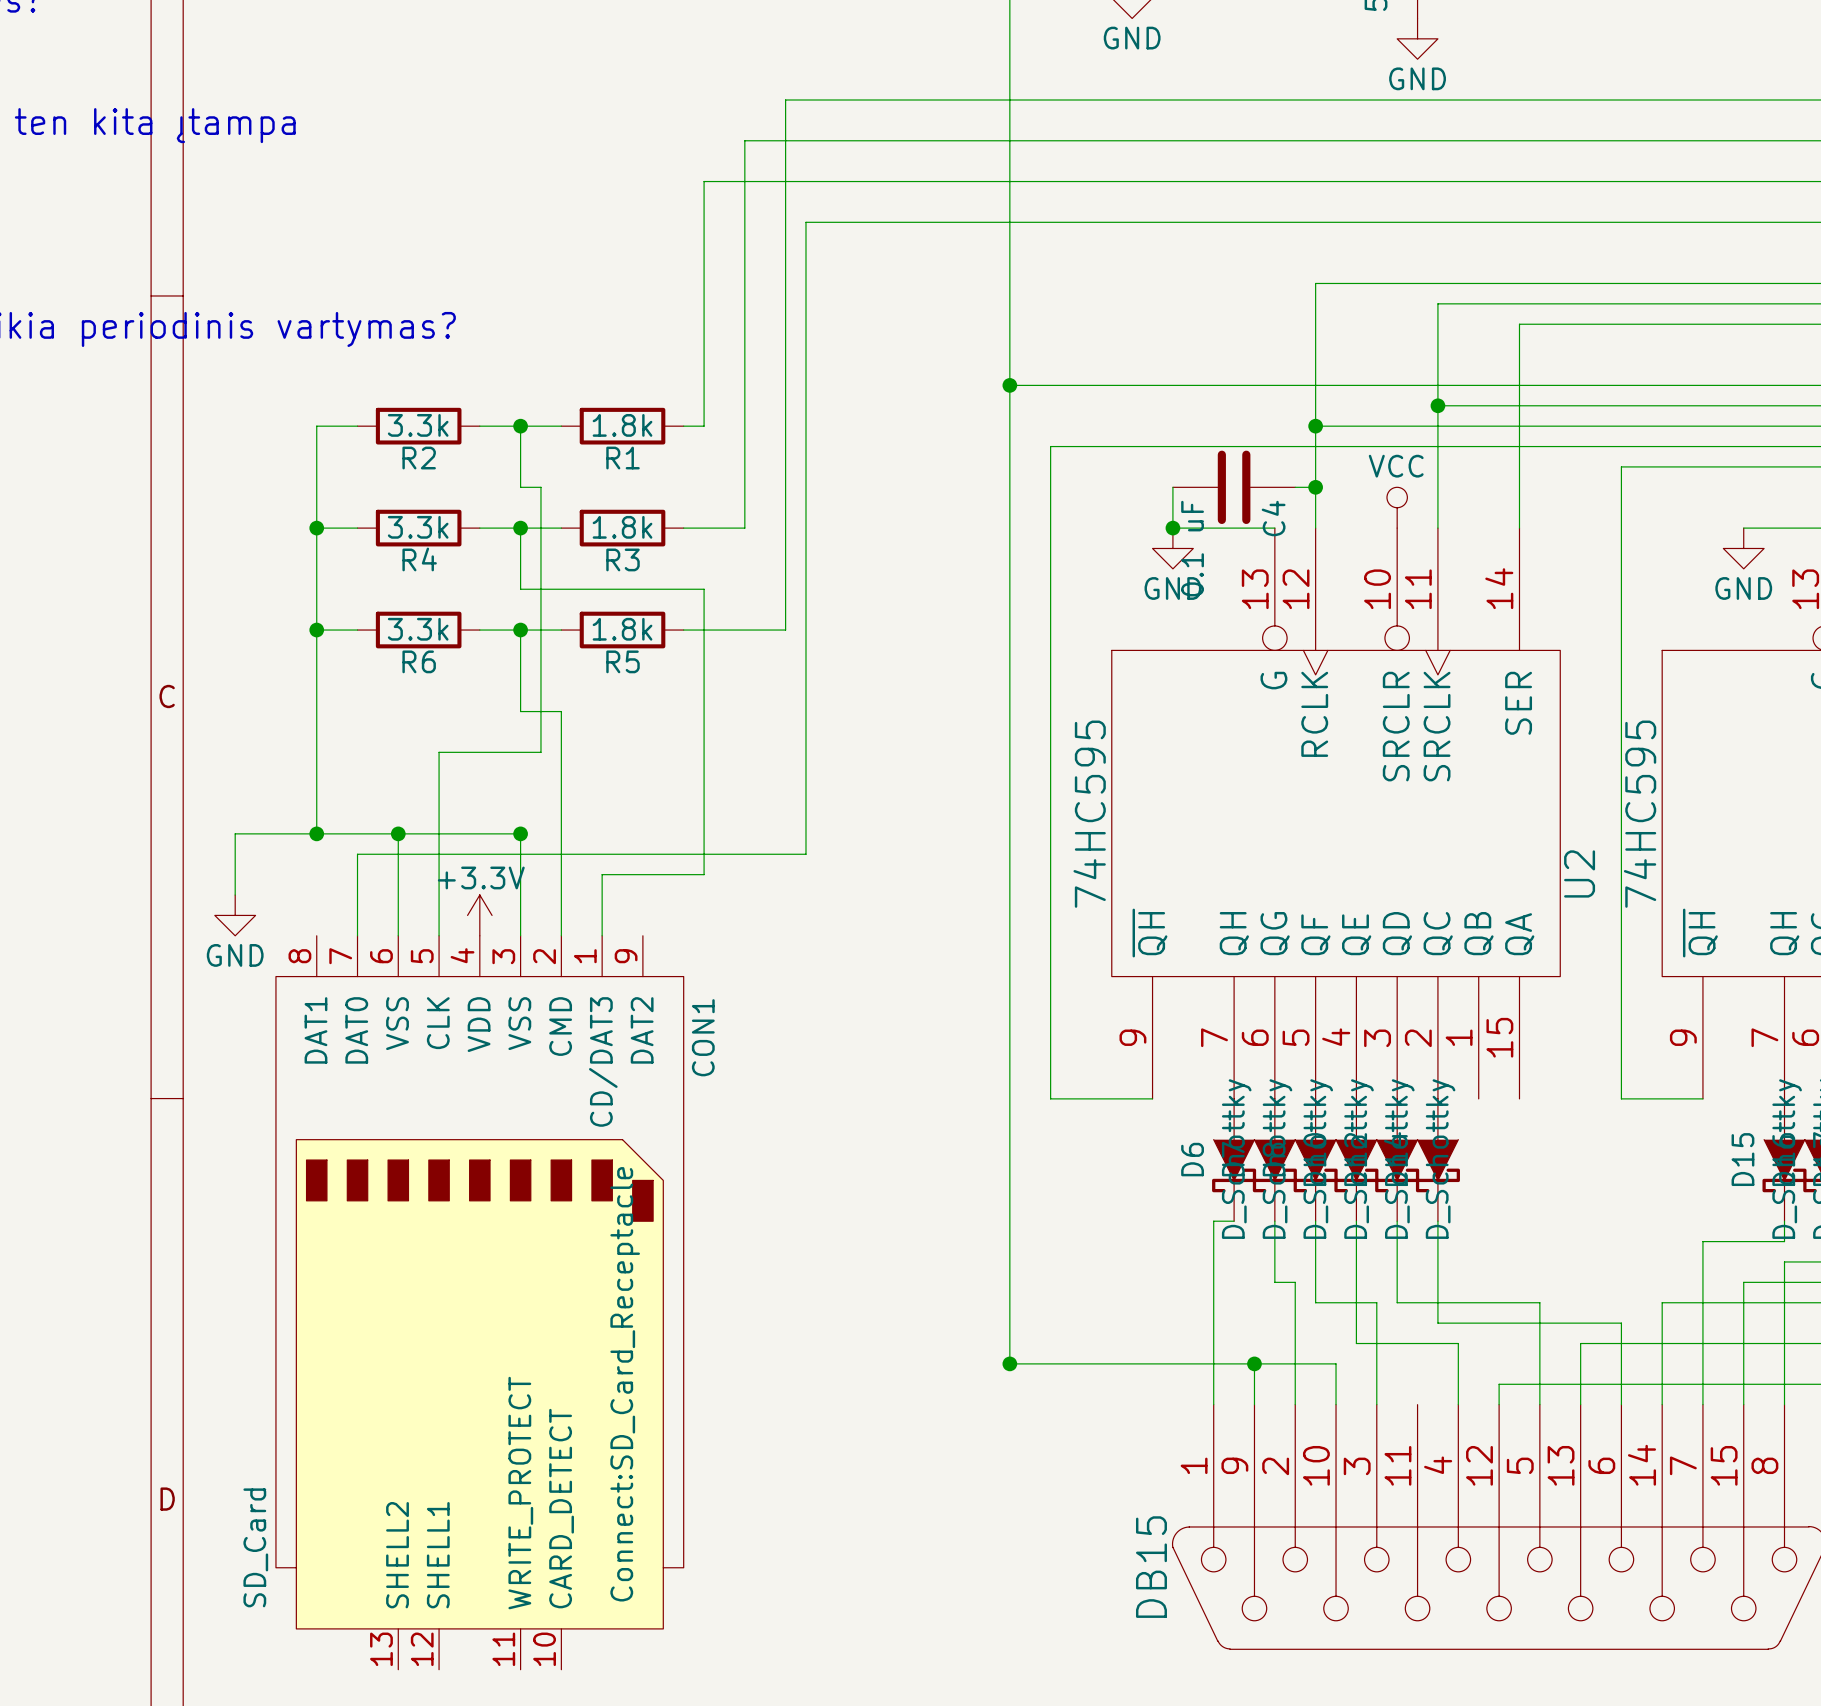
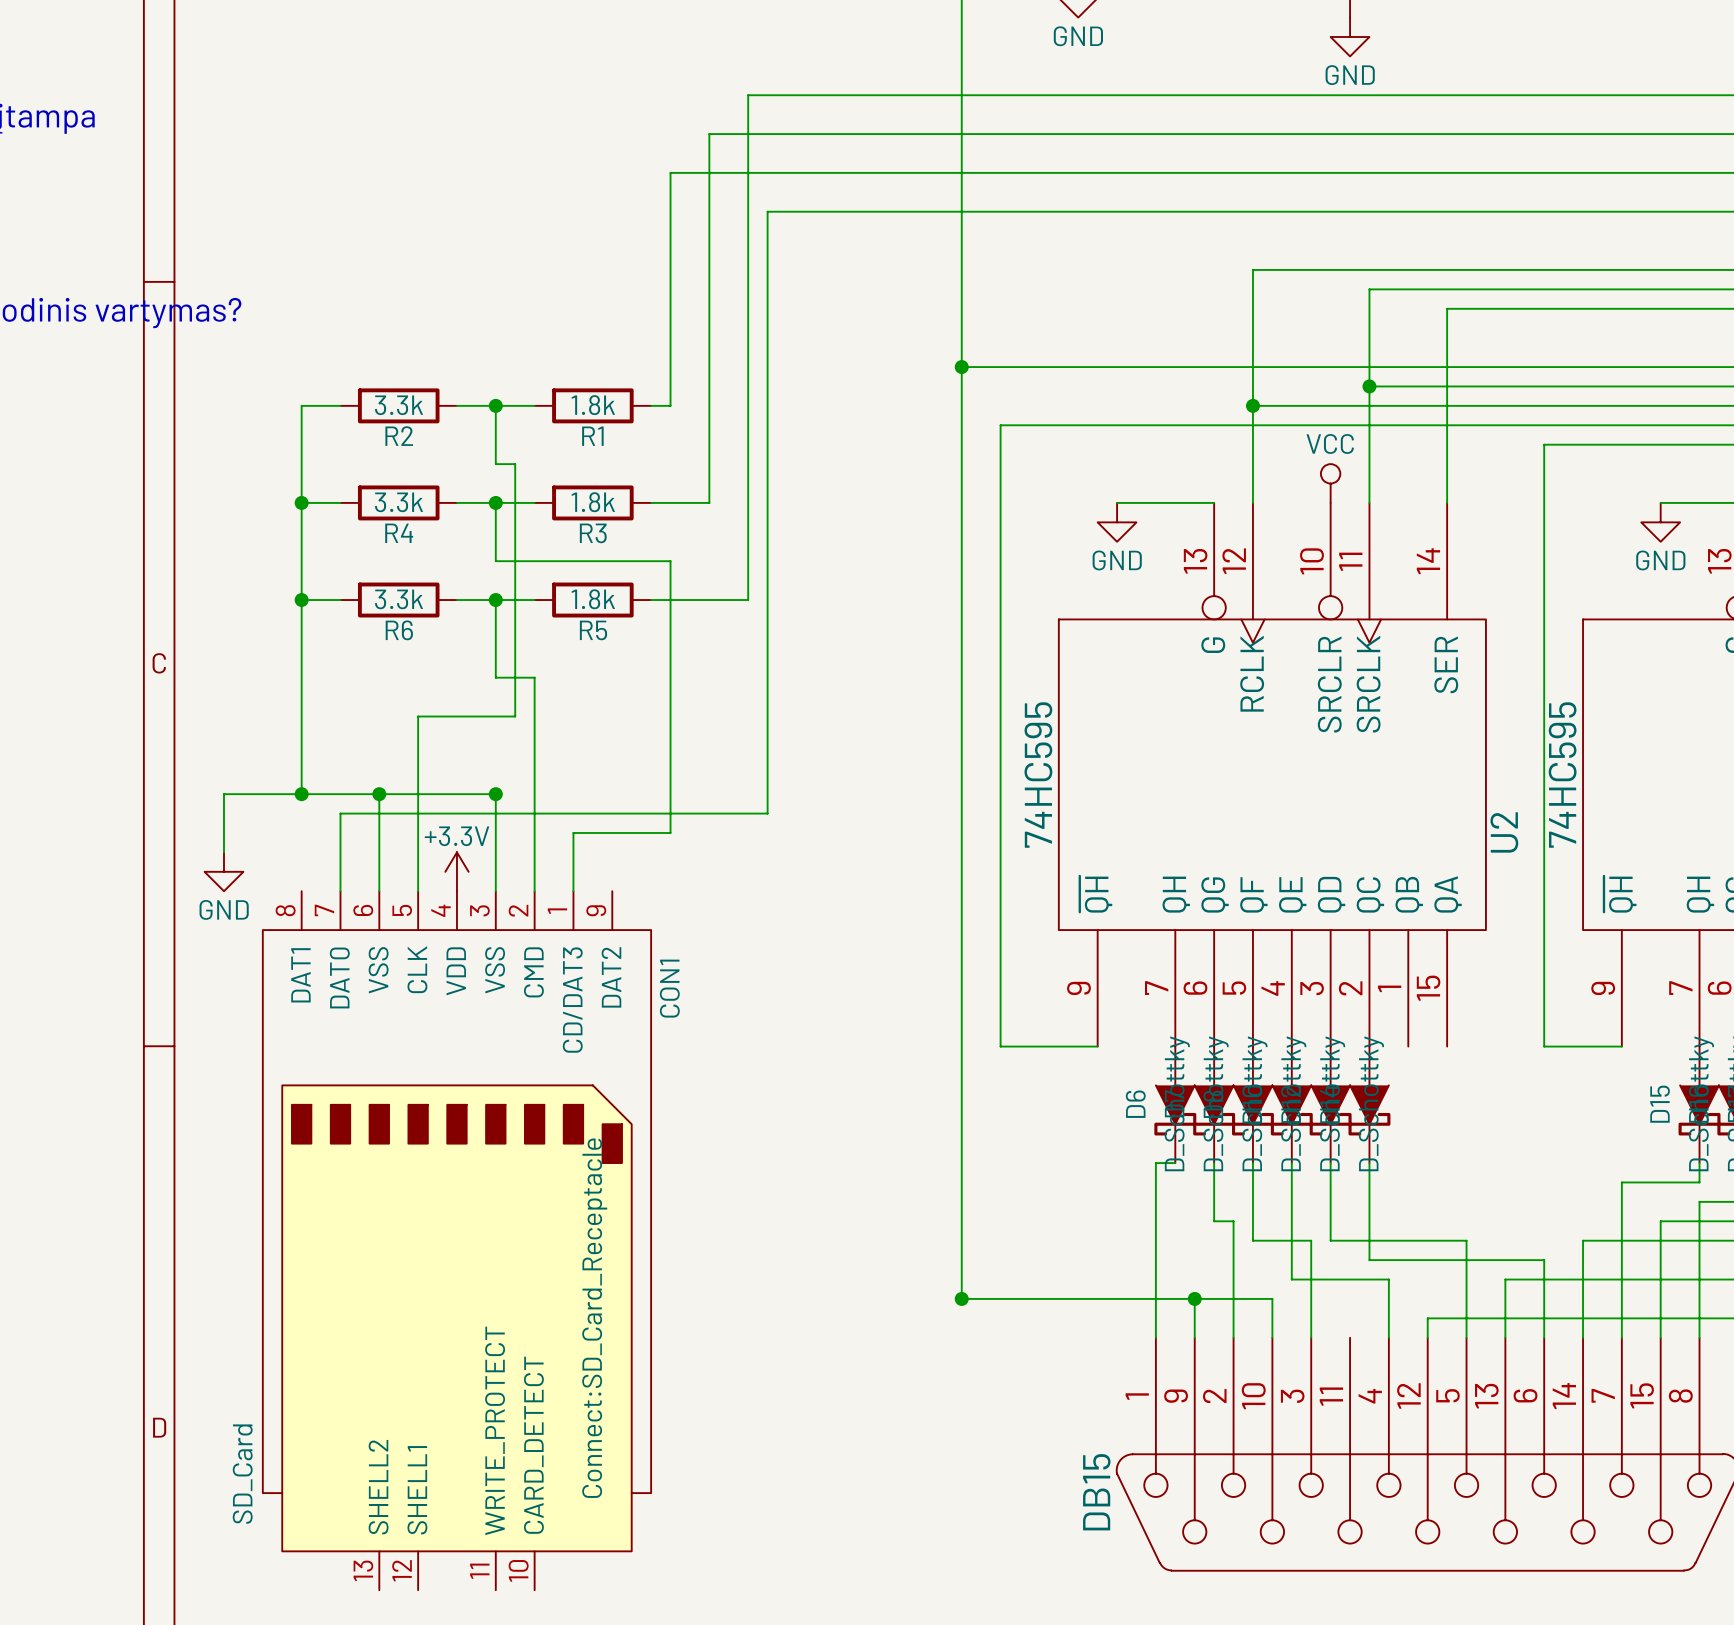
wire: (1172, 487) (1172, 528) -> none
C4: 0.1 uF (1234, 487) -> none
wire: (1295, 487) (1315, 487) -> none
junction: (1315, 487) -> none
junction: (1172, 528) -> none

